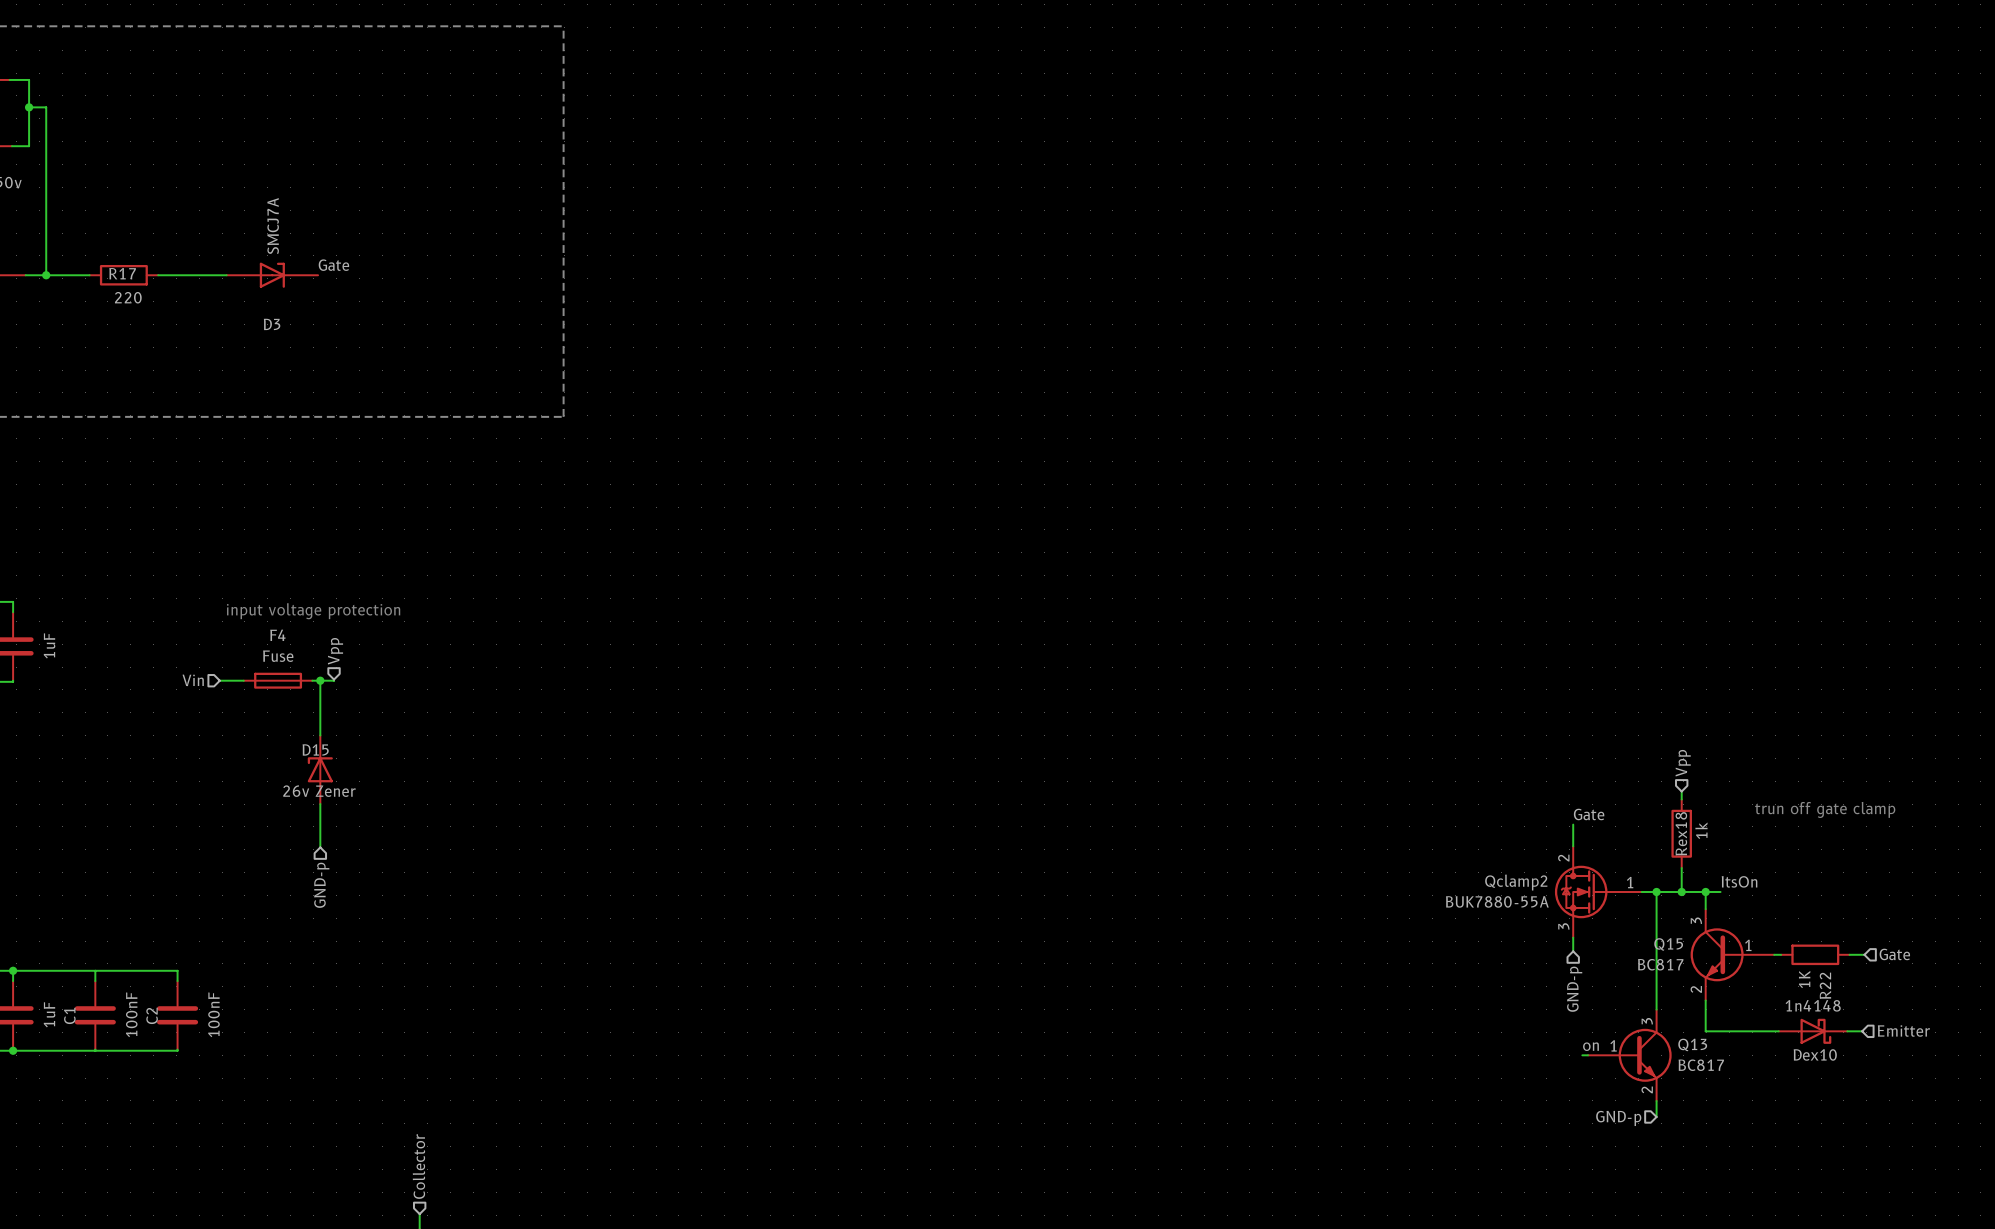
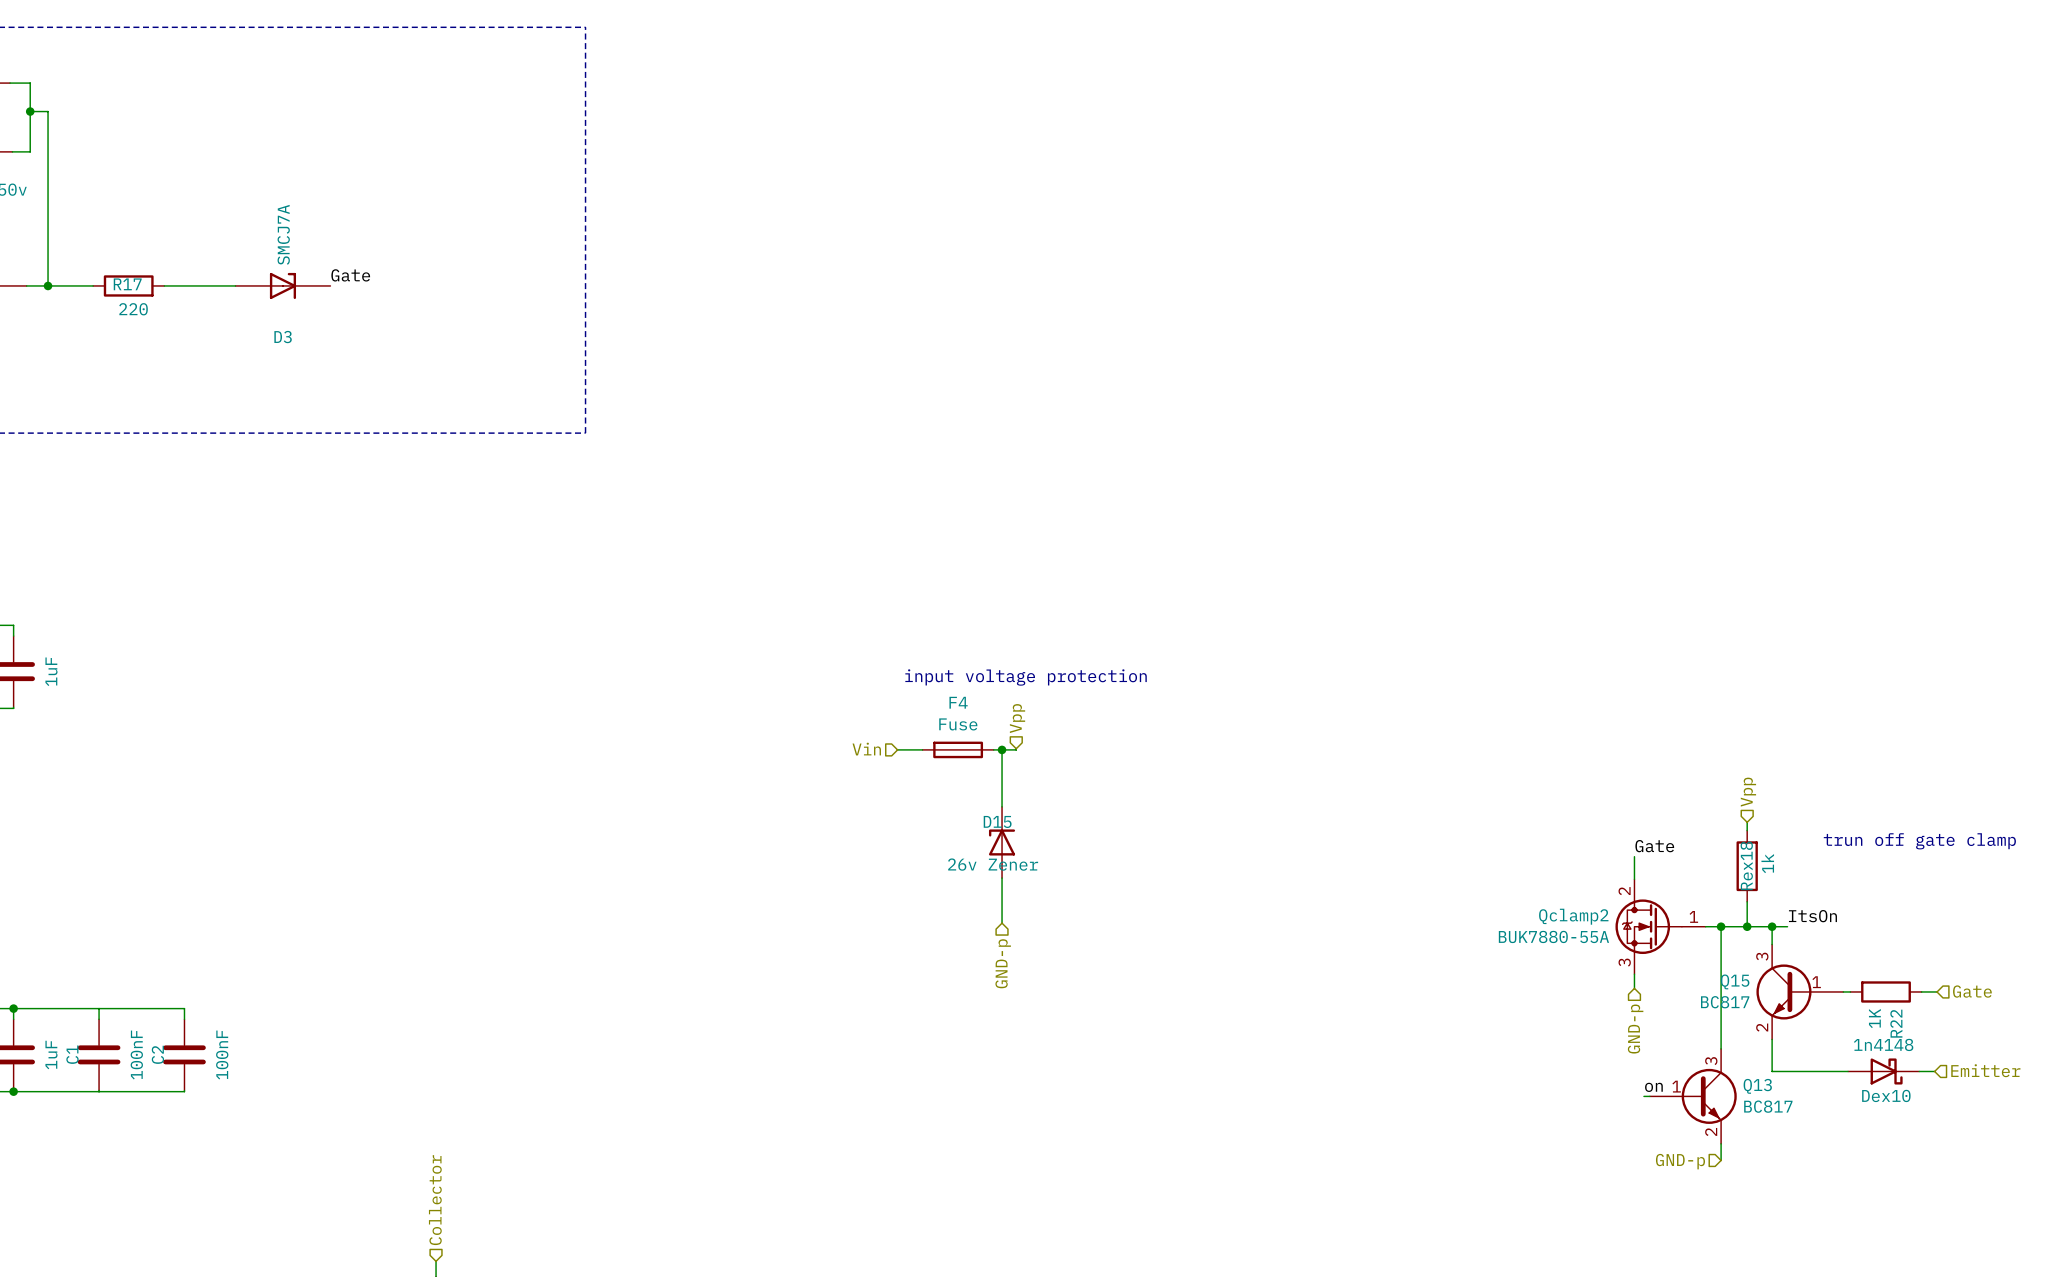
text: input voltage protection (313, 611) -> none
hierarchical label: Vpp (335, 651) -> none
text: none -> input voltage protection (1026, 677)
wire: (334, 679) (312, 680) -> none
hierarchical label: Vin (193, 680) -> none
wire: (219, 680) (243, 680) -> none
F4 position: (278, 680) -> (958, 749)
wire: (320, 680) (320, 735) -> none
junction: (320, 680) -> none
hierarchical label: none -> Vpp (1017, 718)
wire: none -> (1016, 748) (993, 749)
hierarchical label: none -> Vin (866, 749)
wire: none -> (897, 749) (922, 749)
wire: none -> (1002, 749) (1002, 806)
junction: none -> (1002, 749)
D15 position: (320, 769) -> (1002, 842)
wire: (320, 804) (320, 847) -> none
wire: none -> (1002, 878) (1002, 923)
hierarchical label: GND-p (321, 885) -> none
hierarchical label: none -> GND-p (1003, 963)

